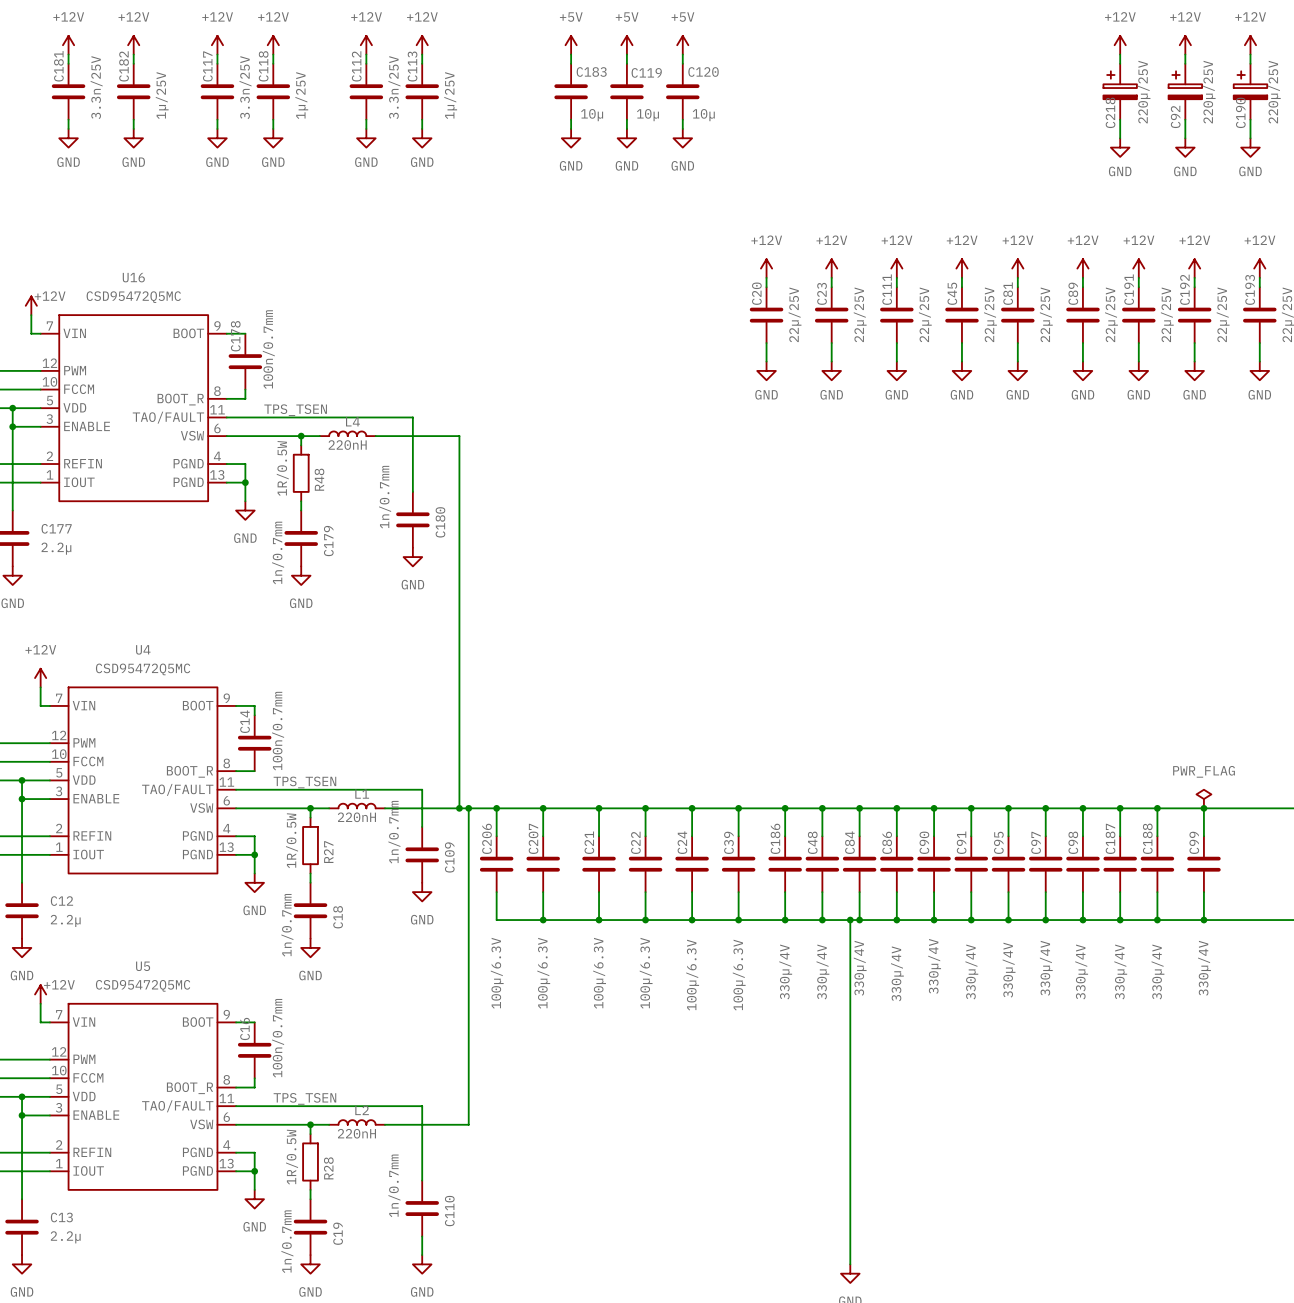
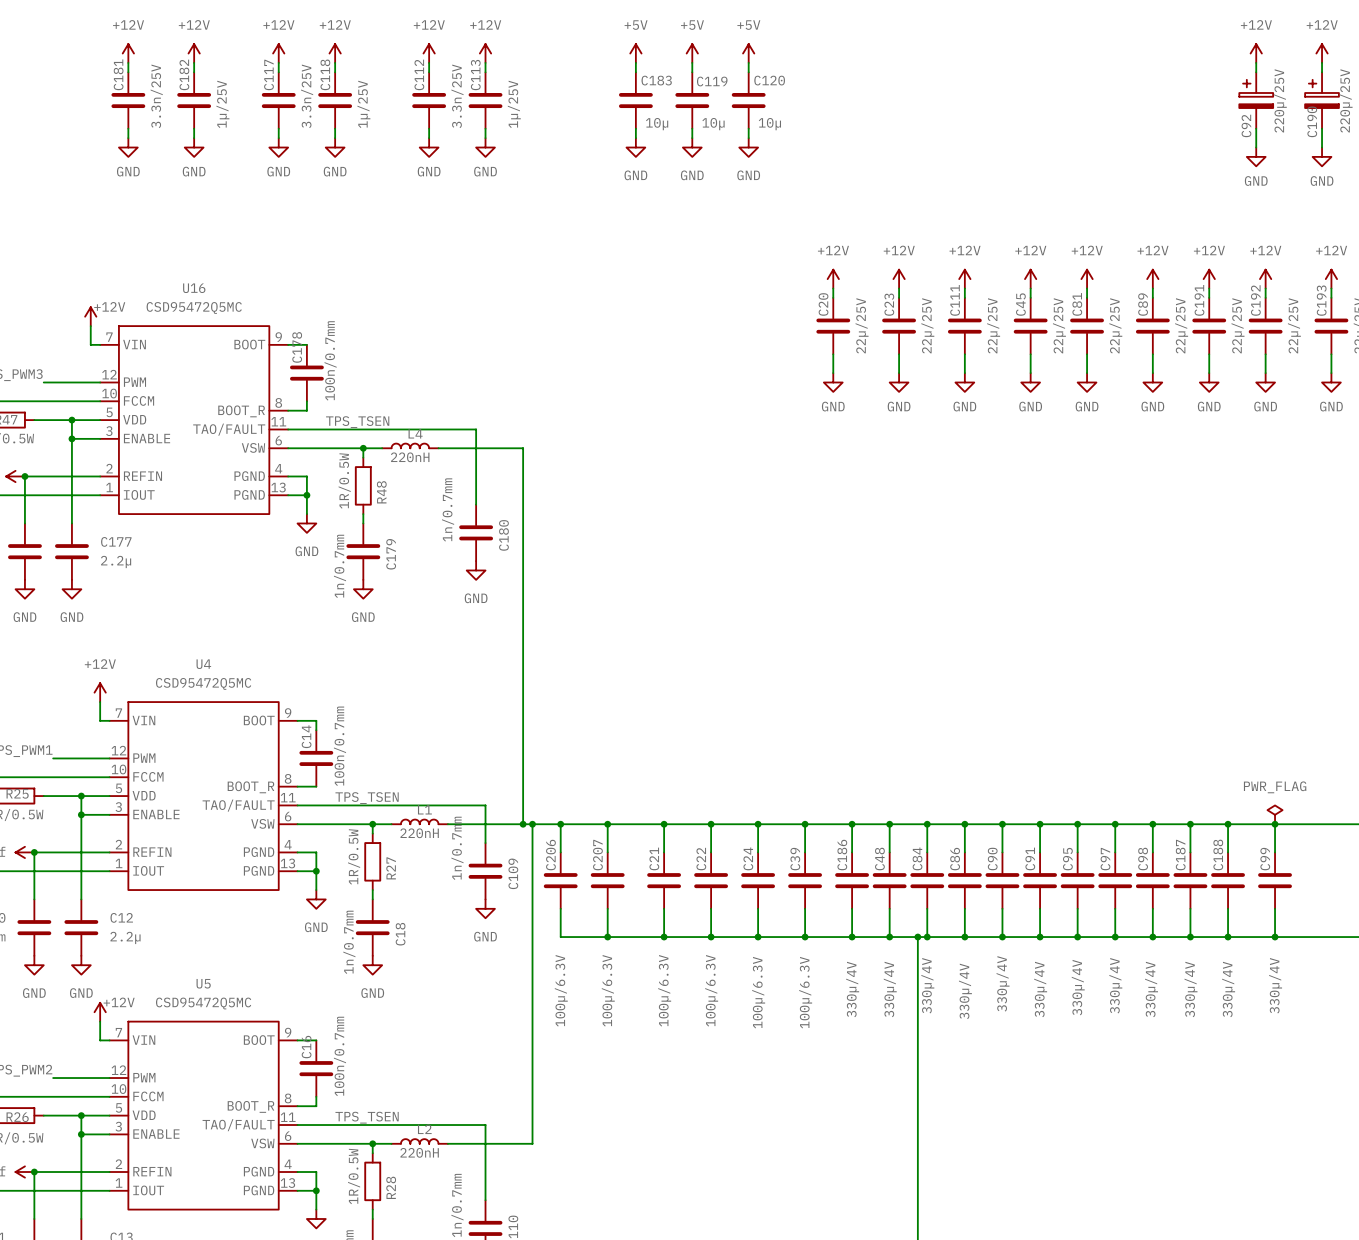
power symbol: +12V (1120, 45) -> none
wire: (1120, 54) (1120, 63) -> none
C218: 220µ/25V (1120, 91) -> none
wire: (1120, 119) (1120, 138) -> none
power symbol: GND (1120, 147) -> none

